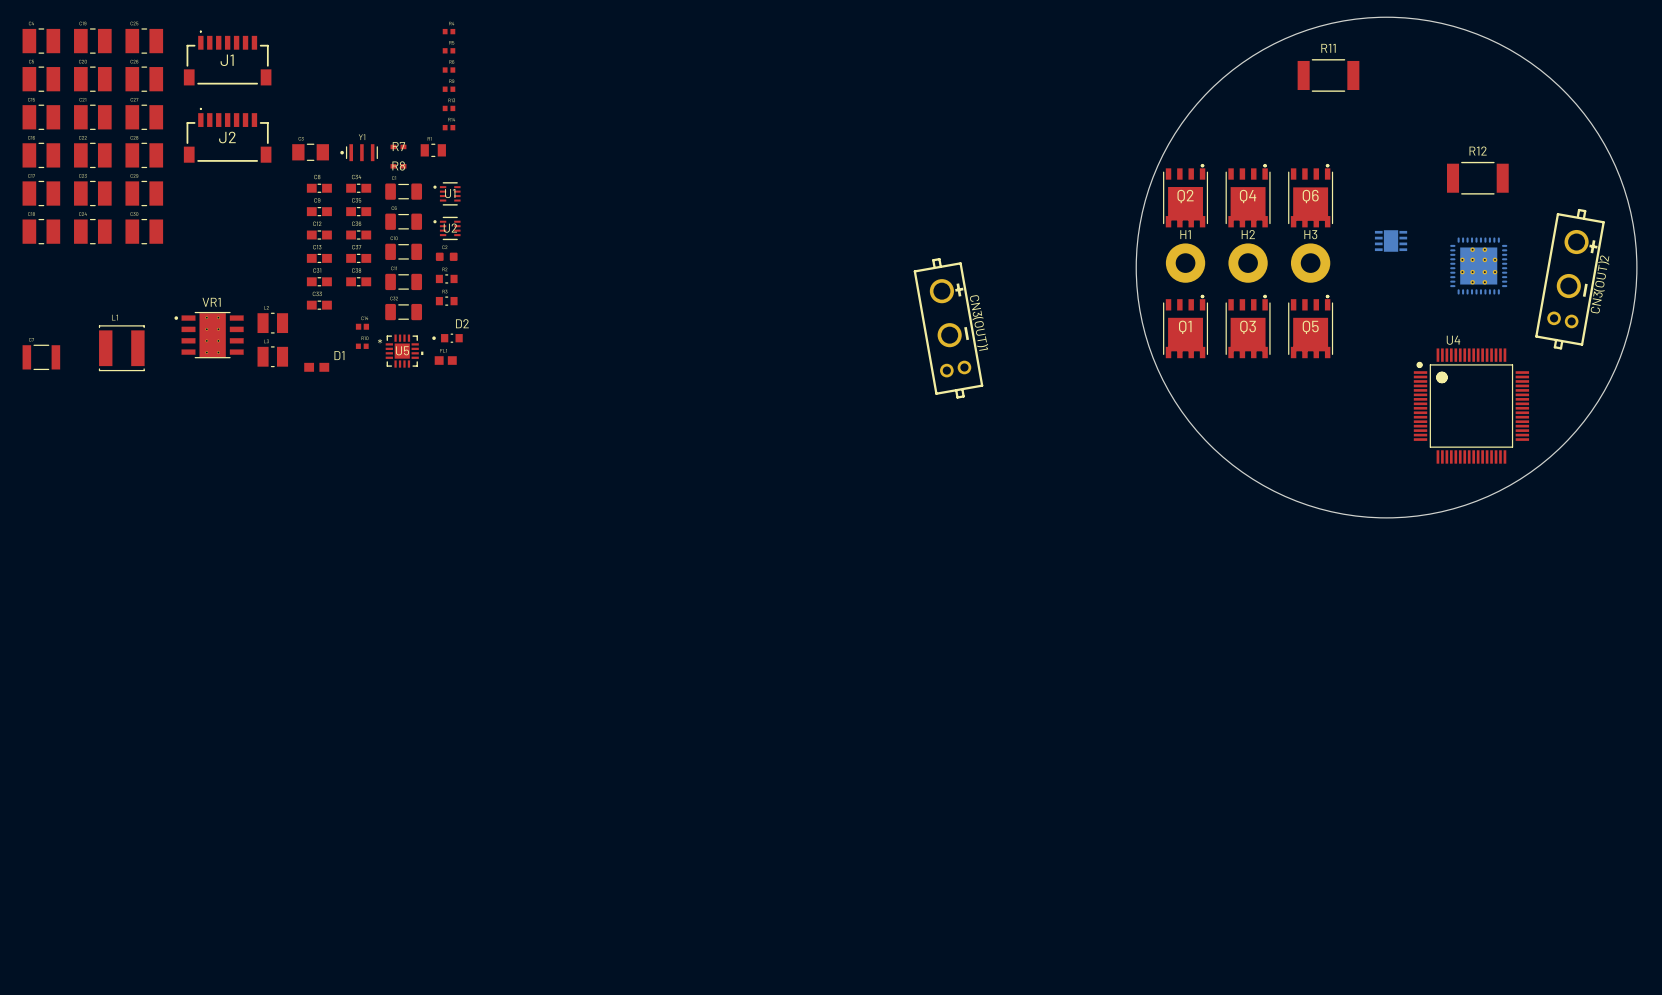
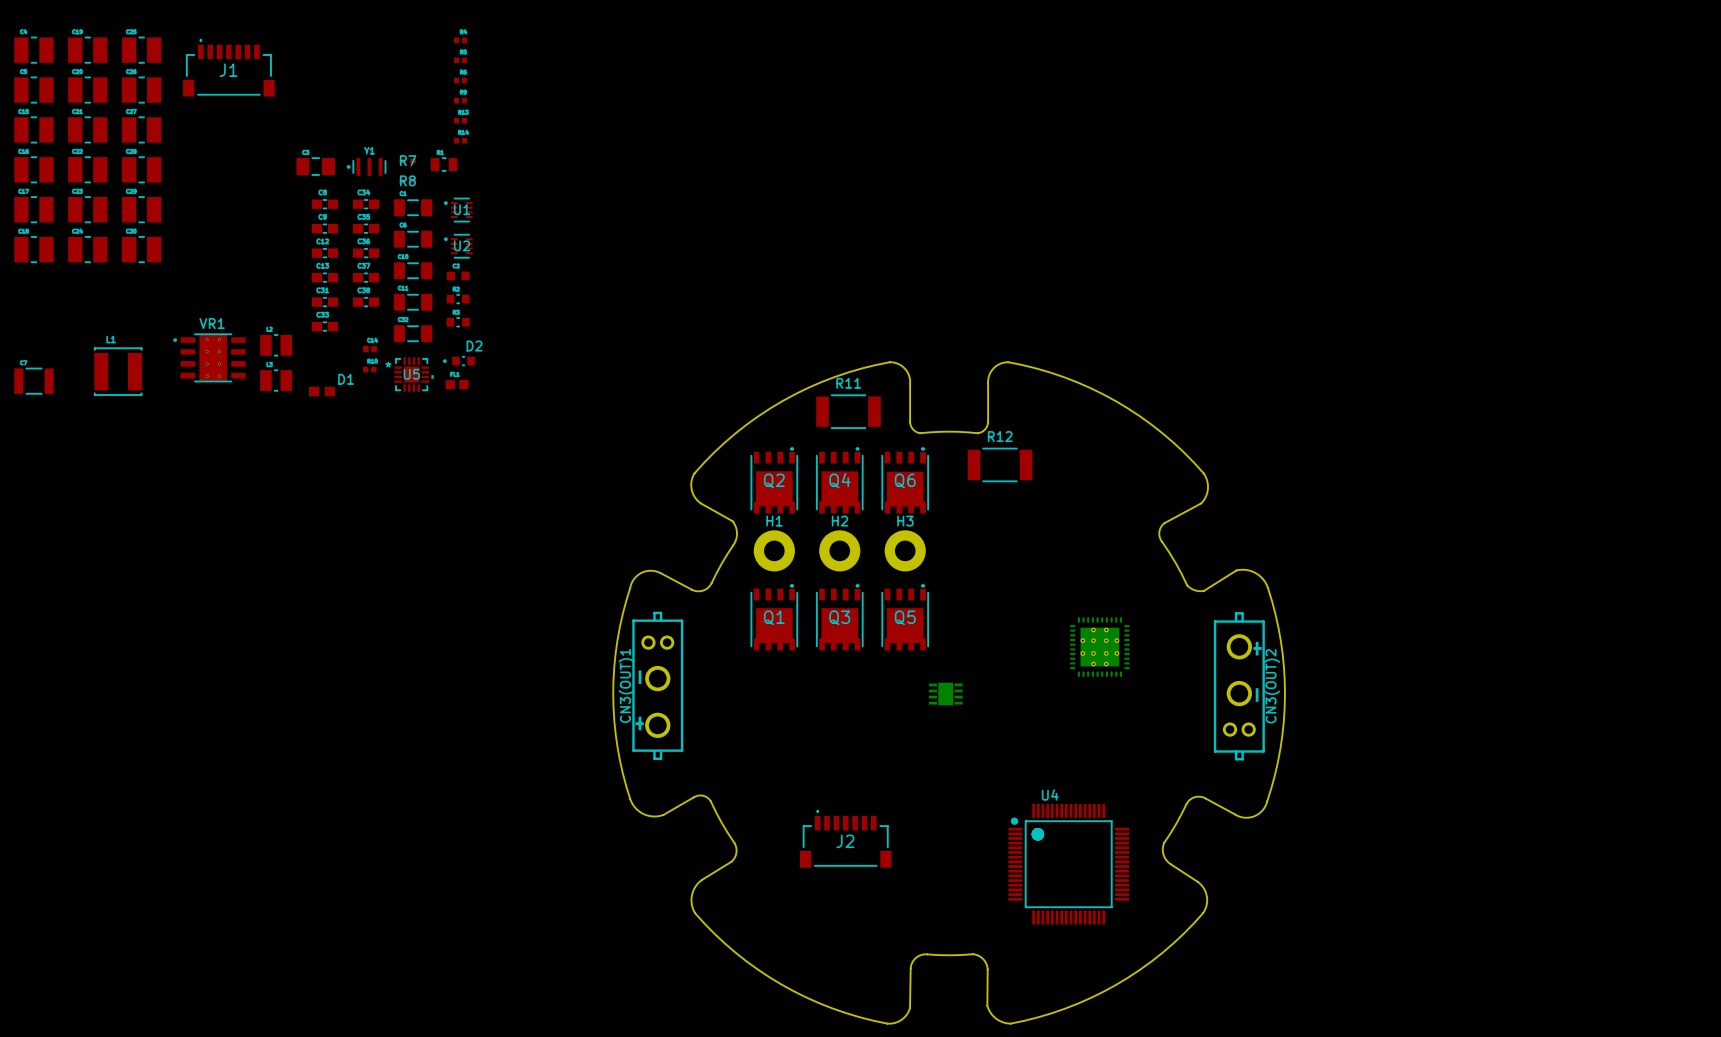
round board edge: [1136, 17, 1638, 519] -> none
R11 position: (1328, 75) -> (848, 411)
J2 position: (227, 135) -> (845, 839)
R12 position: (1477, 178) -> (999, 464)
Q2 position: (1185, 195) -> (774, 480)
Q4 position: (1248, 195) -> (839, 480)
Q6 position: (1310, 195) -> (905, 480)
part: (1391, 240) -> none
H1 position: (1185, 263) -> (774, 550)
H2 position: (1248, 263) -> (839, 550)
H3 position: (1310, 263) -> (905, 550)
part: (1478, 266) -> none
CN3(OUT)2 rotation: 0° (1569, 279) -> 10° counterclockwise (1239, 686)
CN3(OUT)2 position: (1569, 279) -> (1239, 686)
Q1 position: (1185, 326) -> (774, 617)
Q3 position: (1248, 326) -> (839, 617)
Q5 position: (1310, 326) -> (905, 617)
CN3(OUT)1 rotation: 0° (948, 328) -> 170° counterclockwise (657, 685)
CN3(OUT)1 position: (948, 328) -> (657, 685)
board edge: none -> (889, 362) (901, 365) (908, 374) (910, 423) (913, 429) (918, 432) (978, 433) (984, 430) (988, 422) (988, 376) (995, 366) (1005, 362) (1036, 368) (1076, 382) (1102, 394) (1139, 416) (1184, 452) (1203, 473) (1207, 480) (1206, 494) (1201, 503) (1164, 523) (1159, 530) (1160, 539) (1187, 585) (1194, 590) (1203, 590) (1236, 570) (1252, 571) (1261, 577) (1266, 585) (1278, 627) (1284, 681) (1283, 721) (1277, 762) (1265, 806) (1256, 815) (1244, 817) (1203, 797) (1193, 797) (1187, 802) (1163, 844) (1163, 852) (1167, 861) (1197, 881) (1204, 889) (1207, 901) (1203, 913) (1162, 952) (1116, 984) (1065, 1008) (1010, 1023) (998, 1020) (989, 1011) (987, 1005) (987, 965) (983, 959) (975, 954) (924, 954) (916, 957) (910, 966) (909, 1010) (901, 1019) (889, 1023) (859, 1017) (819, 1003) (794, 991) (758, 969) (714, 933) (695, 913) (692, 907) (691, 895) (697, 884) (731, 861) (736, 852) (735, 844) (710, 801) (706, 796) (698, 795) (663, 814) (652, 816) (643, 814) (631, 801) (619, 760) (614, 720) (614, 666) (619, 627) (632, 581) (641, 572) (653, 570) (693, 590) (703, 590) (710, 584) (736, 539) (736, 528) (732, 521) (700, 503) (694, 497) (691, 483) (694, 473) (735, 433) (782, 401) (834, 377) (889, 362)
U4 position: (1471, 406) -> (1068, 864)
part: none -> (1099, 647)
part: none -> (945, 694)

